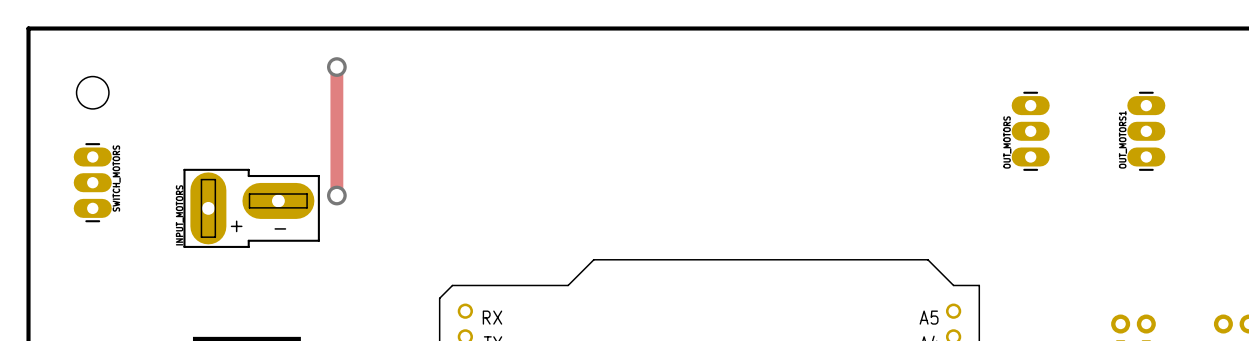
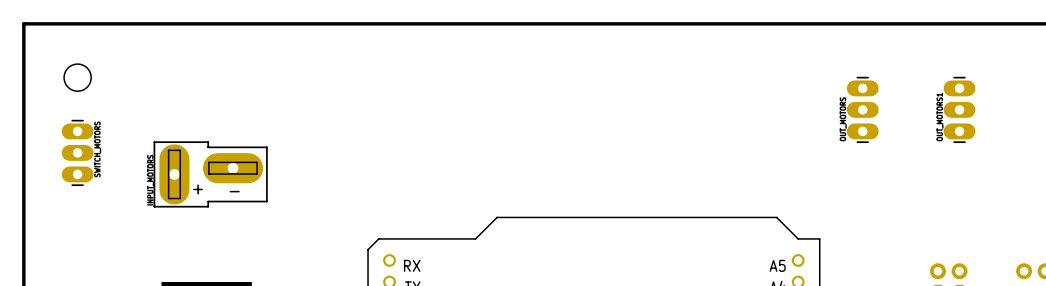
track: (336, 67) (336, 195) -> none
via: (336, 67) -> none
via: (336, 195) -> none

